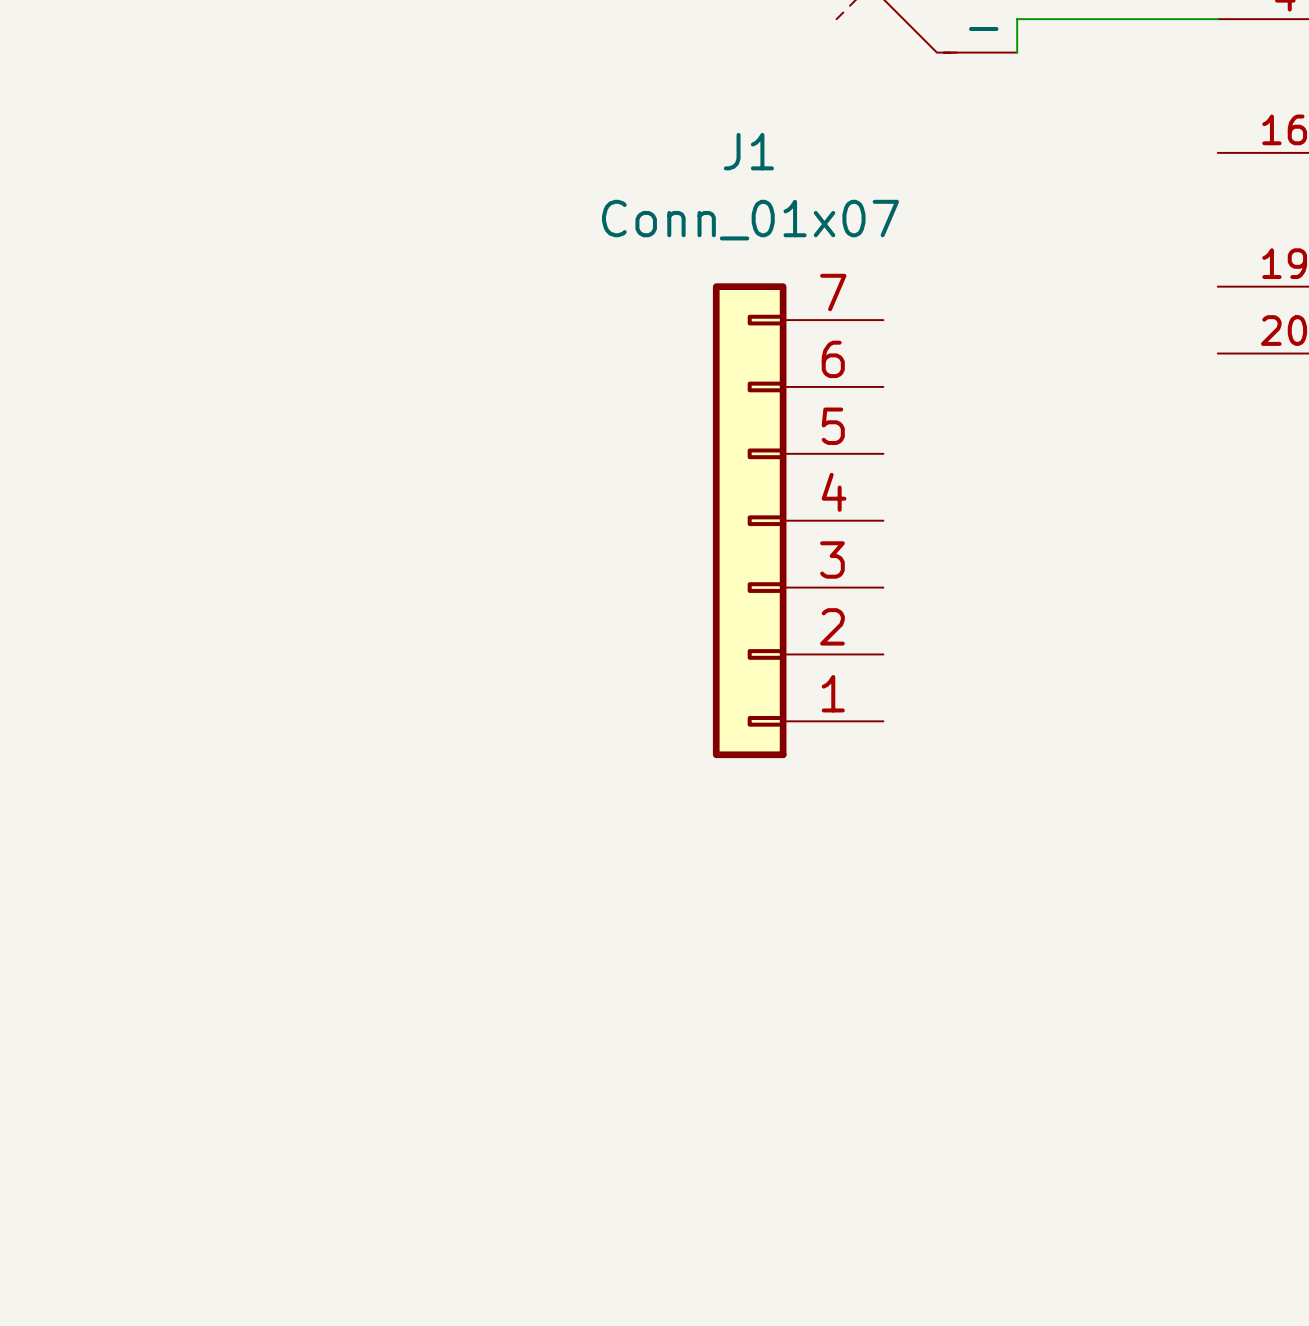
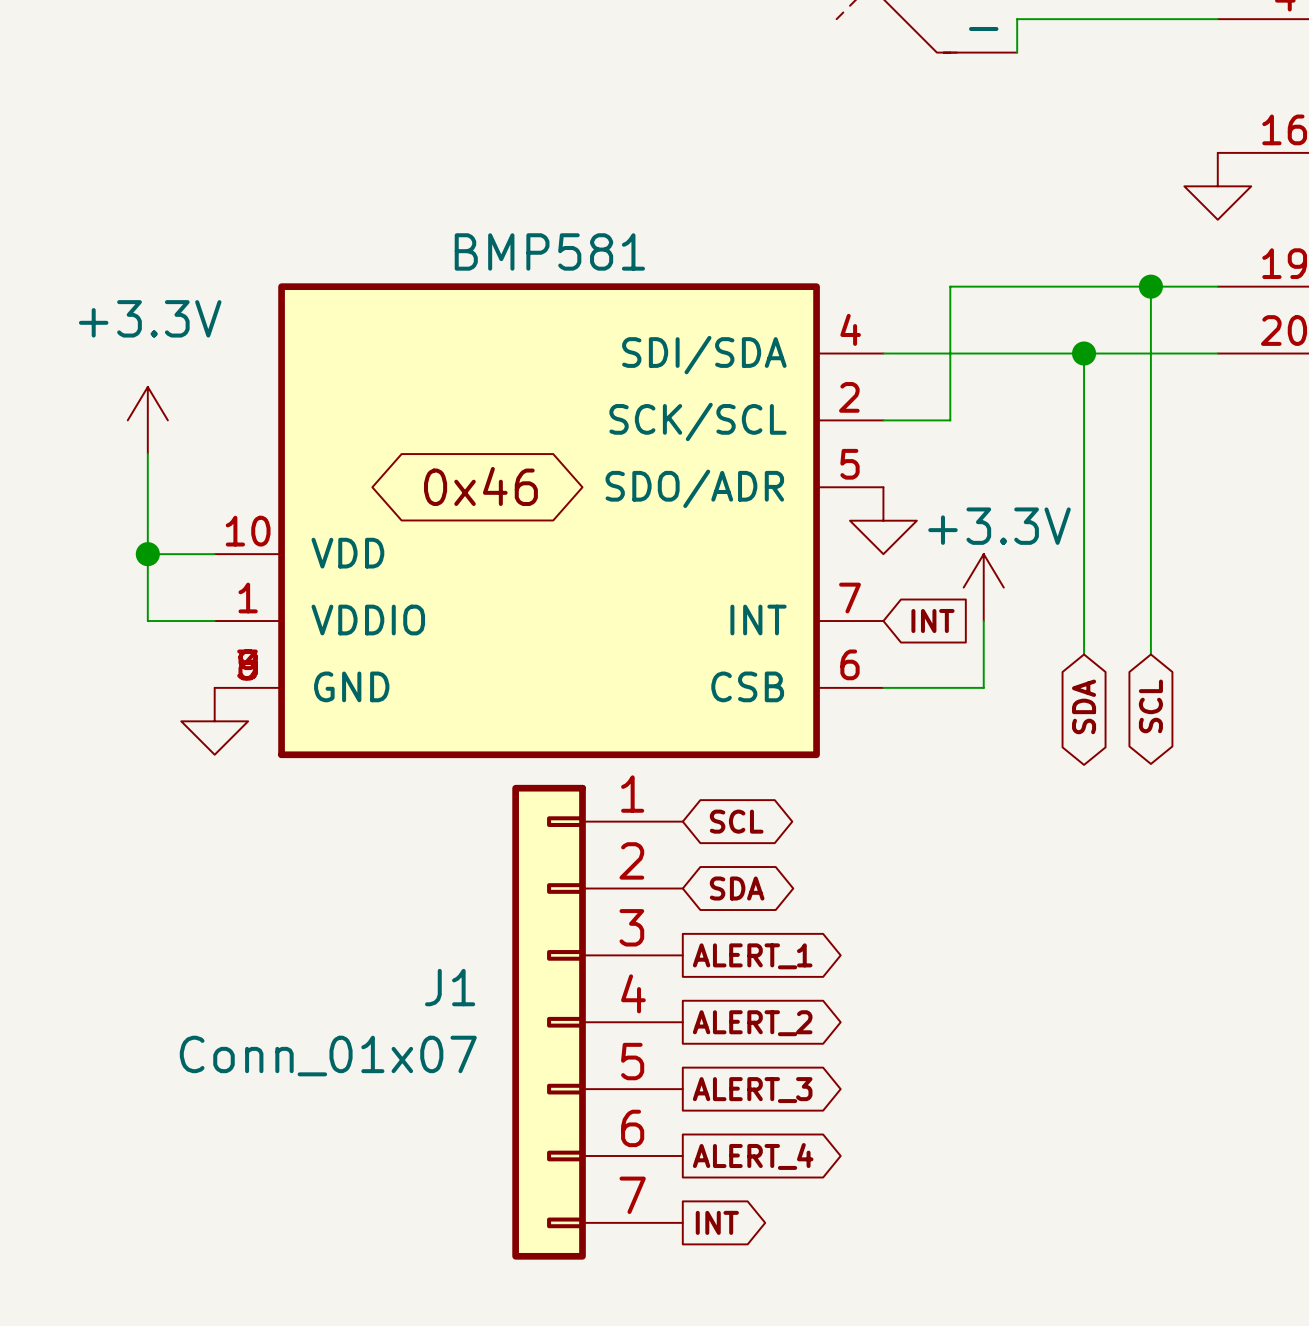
J1 name position: J1 (748, 151) -> J1 (450, 987)
power symbol: none -> (1217, 186)
J1 value position: Conn_01x07 (750, 220) -> Conn_01x07 (328, 1056)
wire: none -> (1150, 286) (1150, 654)
junction: none -> (1150, 286)
wire: none -> (1217, 286) (950, 286) (950, 420) (883, 420)
wire: none -> (883, 353) (1217, 353)
wire: none -> (1084, 353) (1084, 654)
junction: none -> (1084, 353)
power symbol: none -> +3.3V (147, 420)
wire: none -> (147, 453) (147, 621) (214, 621)
global label: none -> 0x46 (480, 486)
part: none -> BMP581 (549, 520)
J1 flip: as is (749, 520) -> up-down (549, 1022)
J1 position: (798, 520) -> (597, 1022)
power symbol: none -> (883, 520)
wire: none -> (147, 554) (214, 554)
junction: none -> (147, 554)
power symbol: none -> +3.3V (983, 587)
global label: none -> INT (933, 621)
wire: none -> (983, 621) (983, 687) (883, 687)
global label: none -> SDA (1084, 706)
global label: none -> SCL (1150, 706)
power symbol: none -> (214, 721)
global label: none -> SCL (736, 821)
global label: none -> SDA (737, 888)
global label: none -> ALERT_1 (752, 956)
global label: none -> ALERT_2 (752, 1023)
global label: none -> ALERT_3 (752, 1090)
global label: none -> ALERT_4 (753, 1156)
global label: none -> INT (717, 1222)

